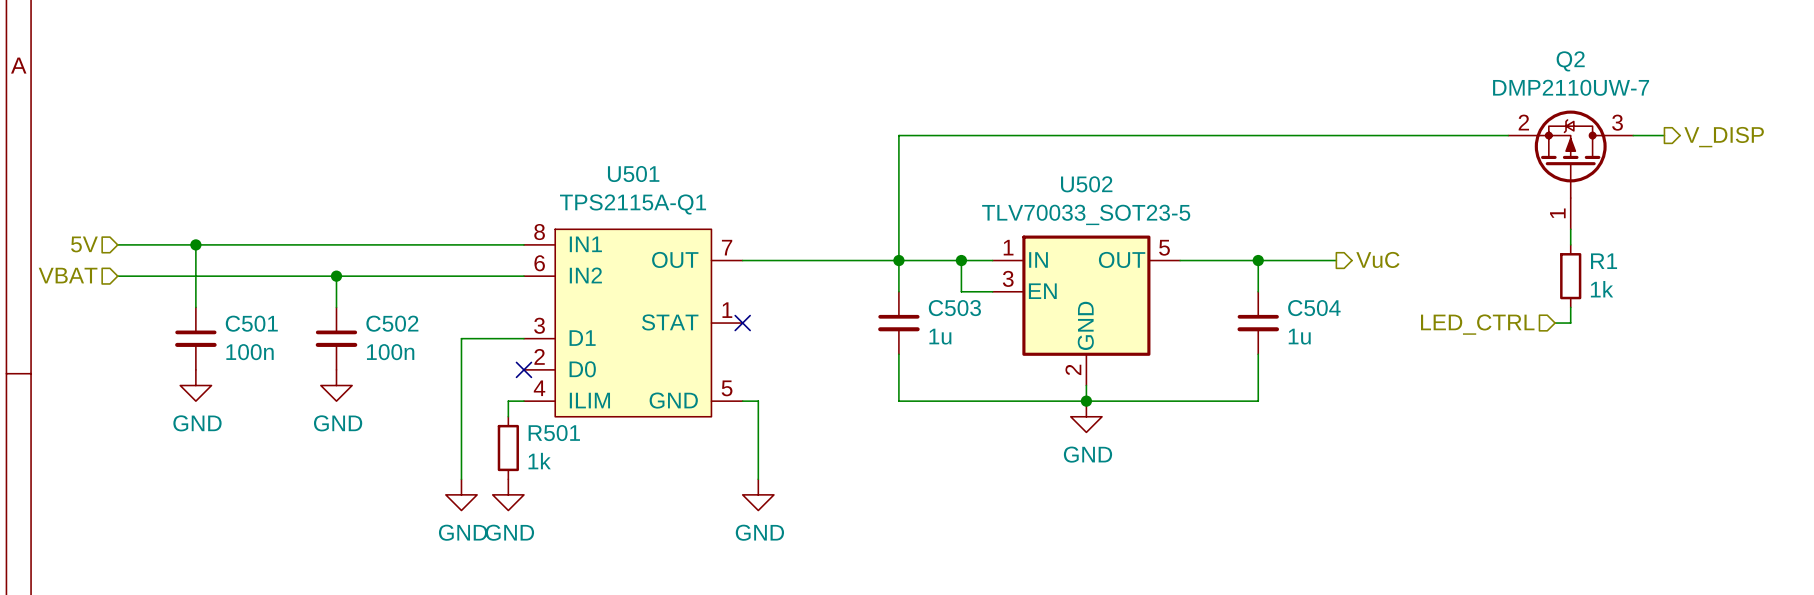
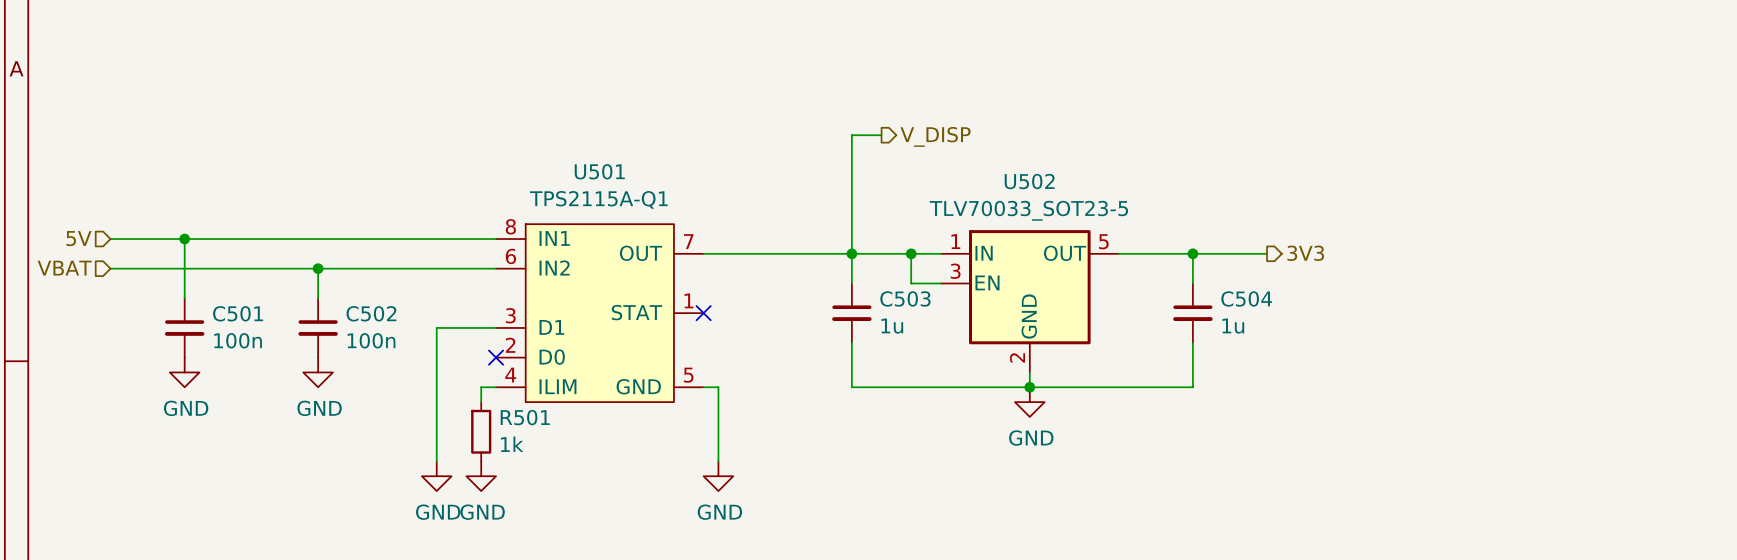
wire: (930, 135) (1508, 135) -> none
wire: (1633, 135) (1664, 135) -> none
hierarchical label: none -> V_DISP (935, 136)
hierarchical label: V_DISP (1724, 137) -> none
Q2: DMP2110UW-7 (1570, 169) -> none
wire: (1570, 229) (1570, 244) -> none
hierarchical label: VuC (1377, 259) -> 3V3 (1305, 253)
R1: 1k (1570, 276) -> none
wire: (1570, 307) (1570, 323) (1555, 323) -> none
hierarchical label: LED_CTRL (1477, 324) -> none

